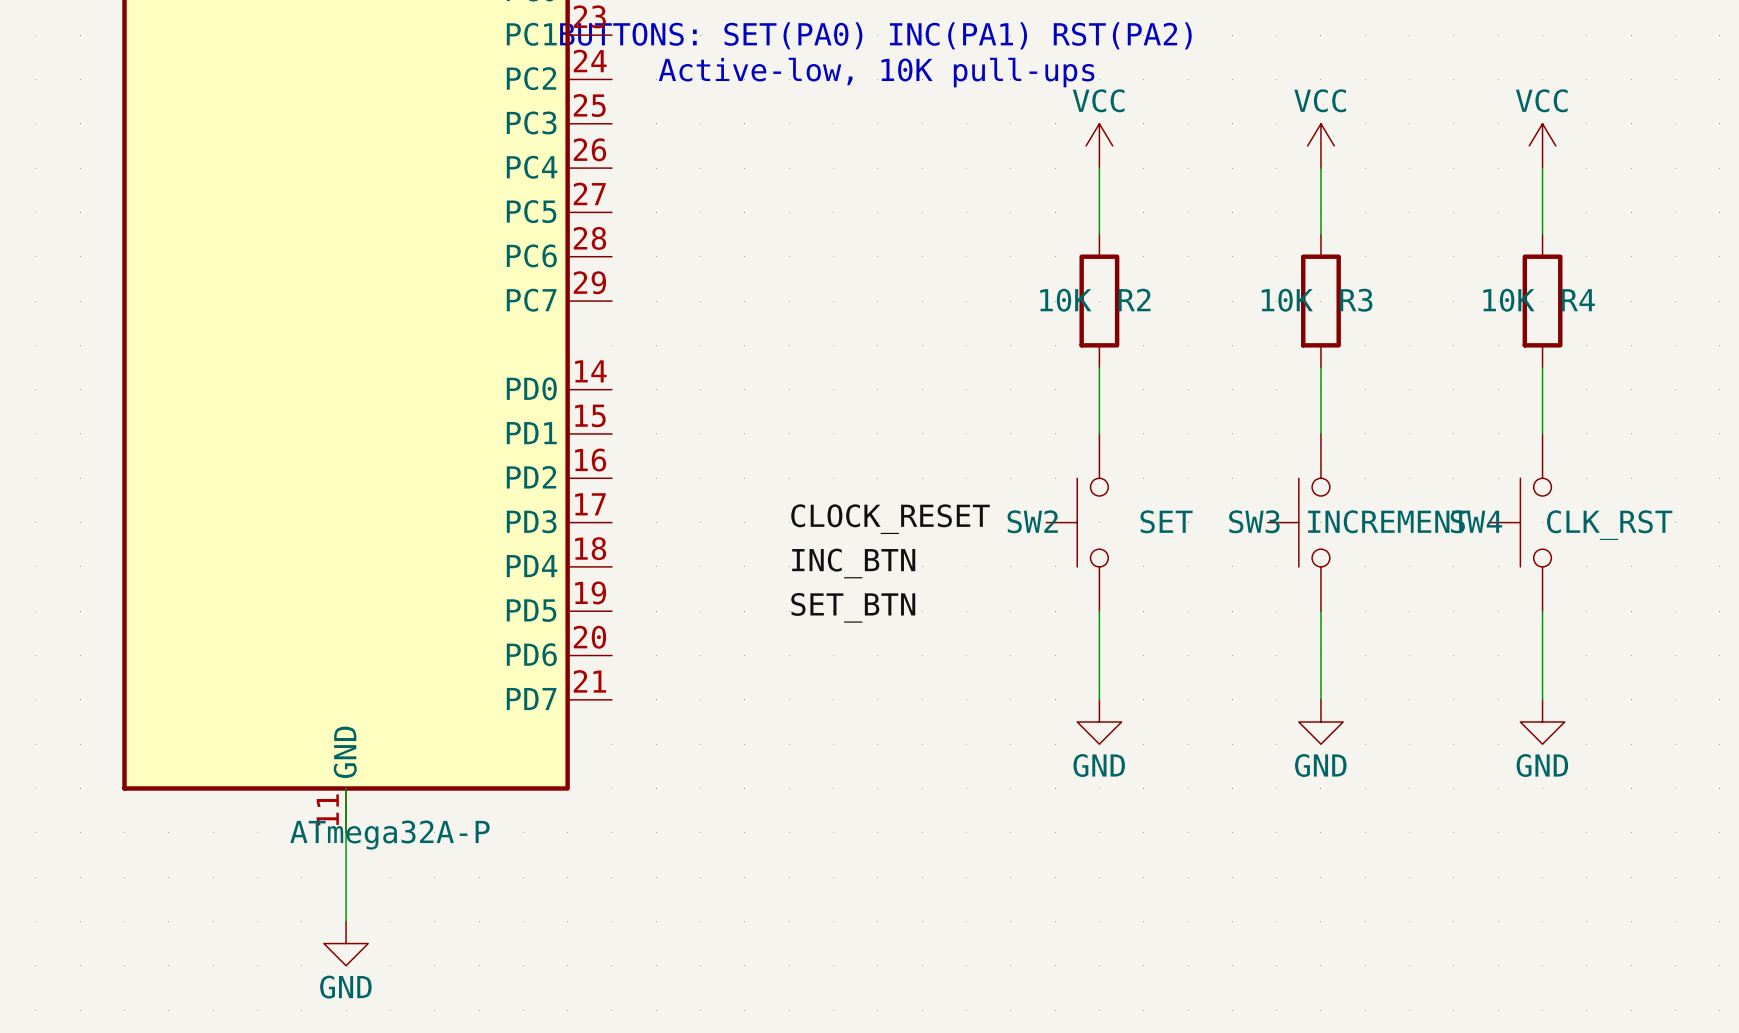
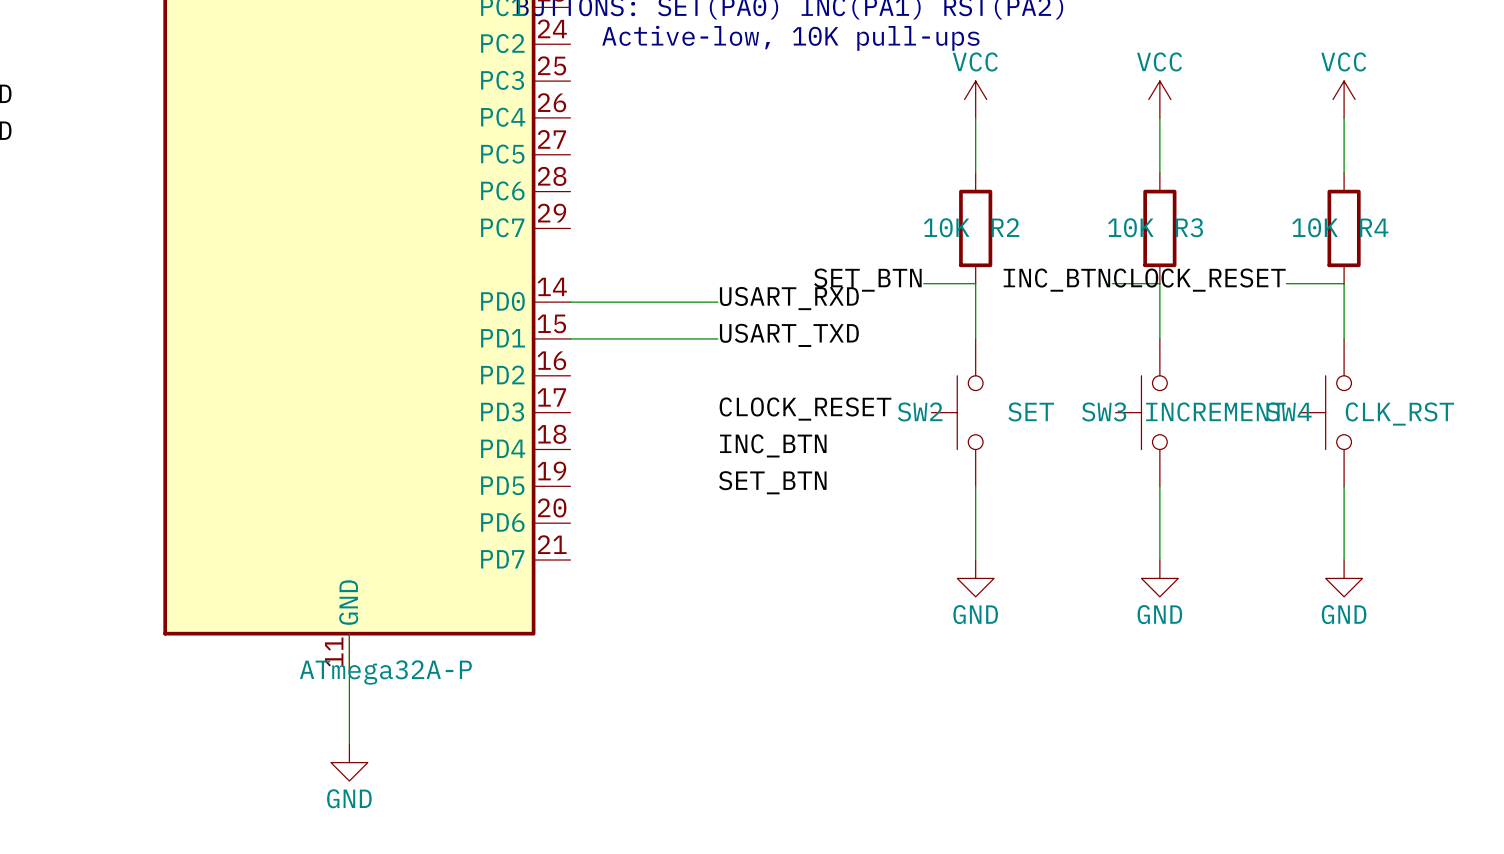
label: none -> SET_BTN (867, 280)
label: none -> INC_BTN (1056, 280)
label: none -> CLOCK_RESET (1199, 280)
wire: none -> (923, 283) (975, 283)
wire: none -> (1112, 283) (1159, 283)
wire: none -> (1286, 283) (1344, 283)
label: none -> USART_RXD (789, 298)
wire: none -> (570, 302) (717, 302)
label: none -> USART_TXD (789, 335)
wire: none -> (570, 338) (717, 338)

